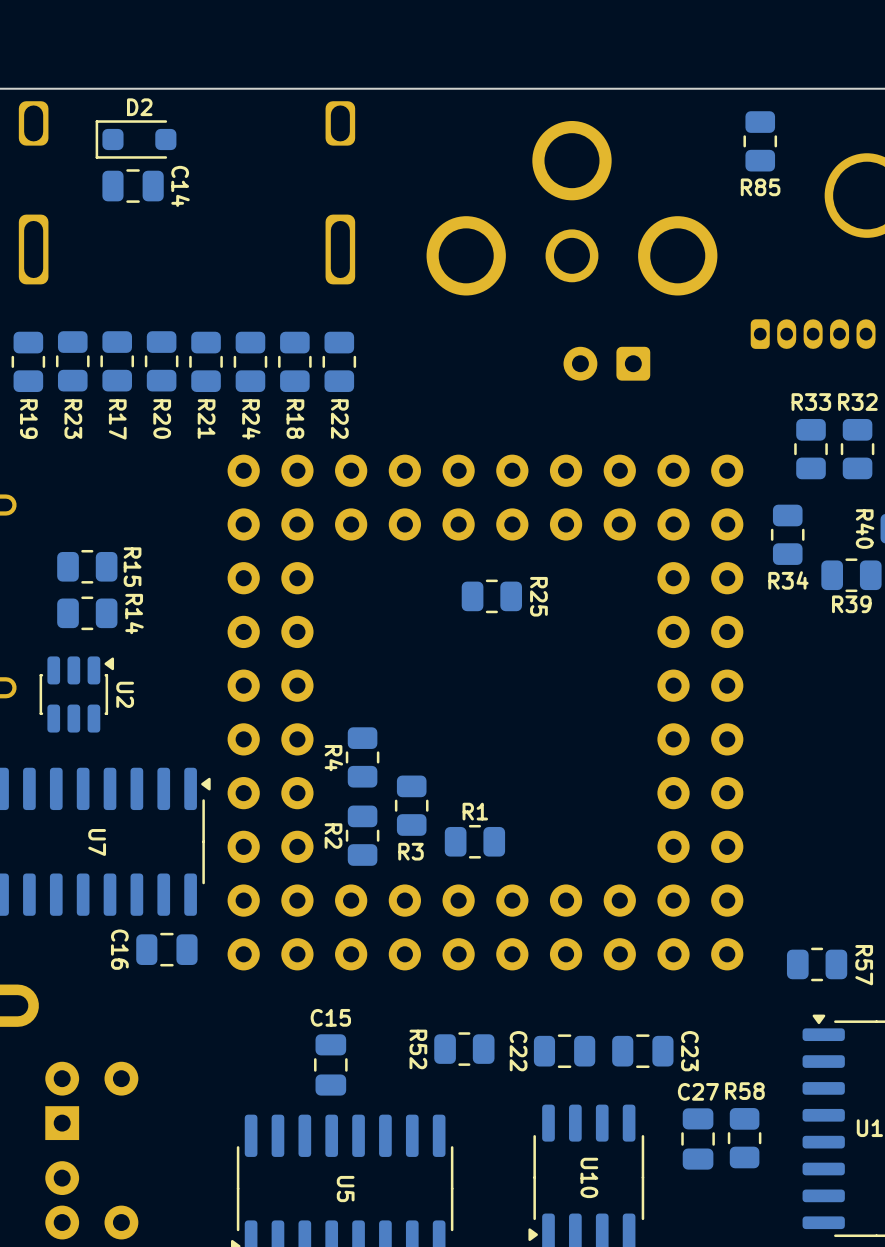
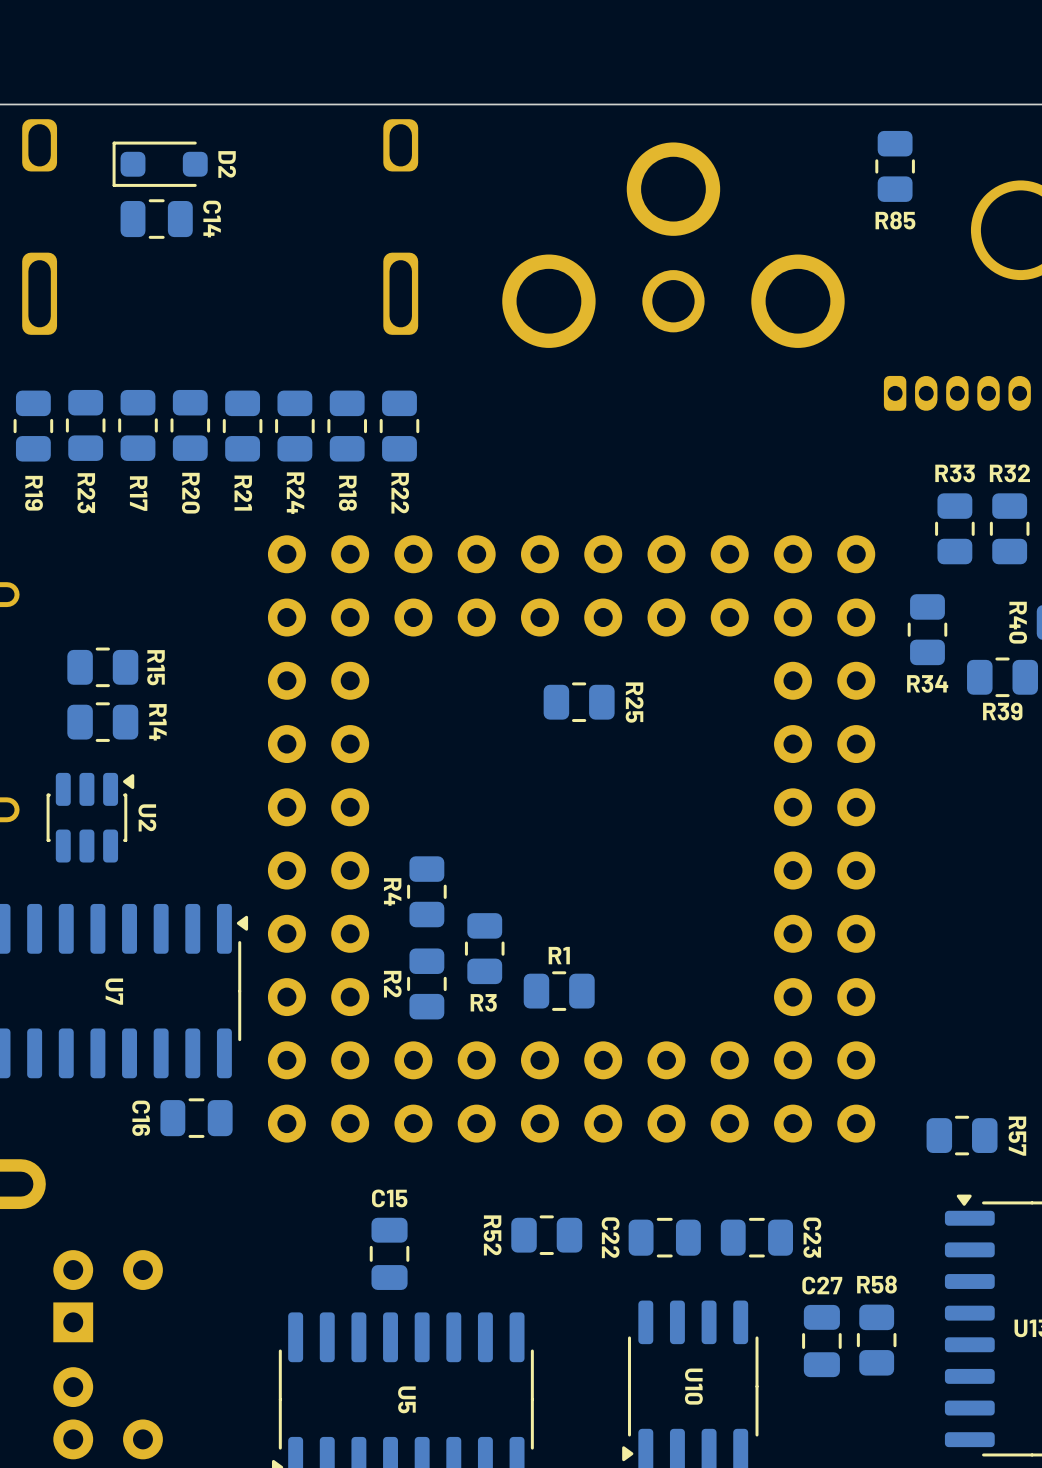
D2 name rotation: 0° (139, 107) -> 90° clockwise (227, 164)
D2 name position: D2 (139, 107) -> D2 (227, 164)
part: (606, 363) -> none

